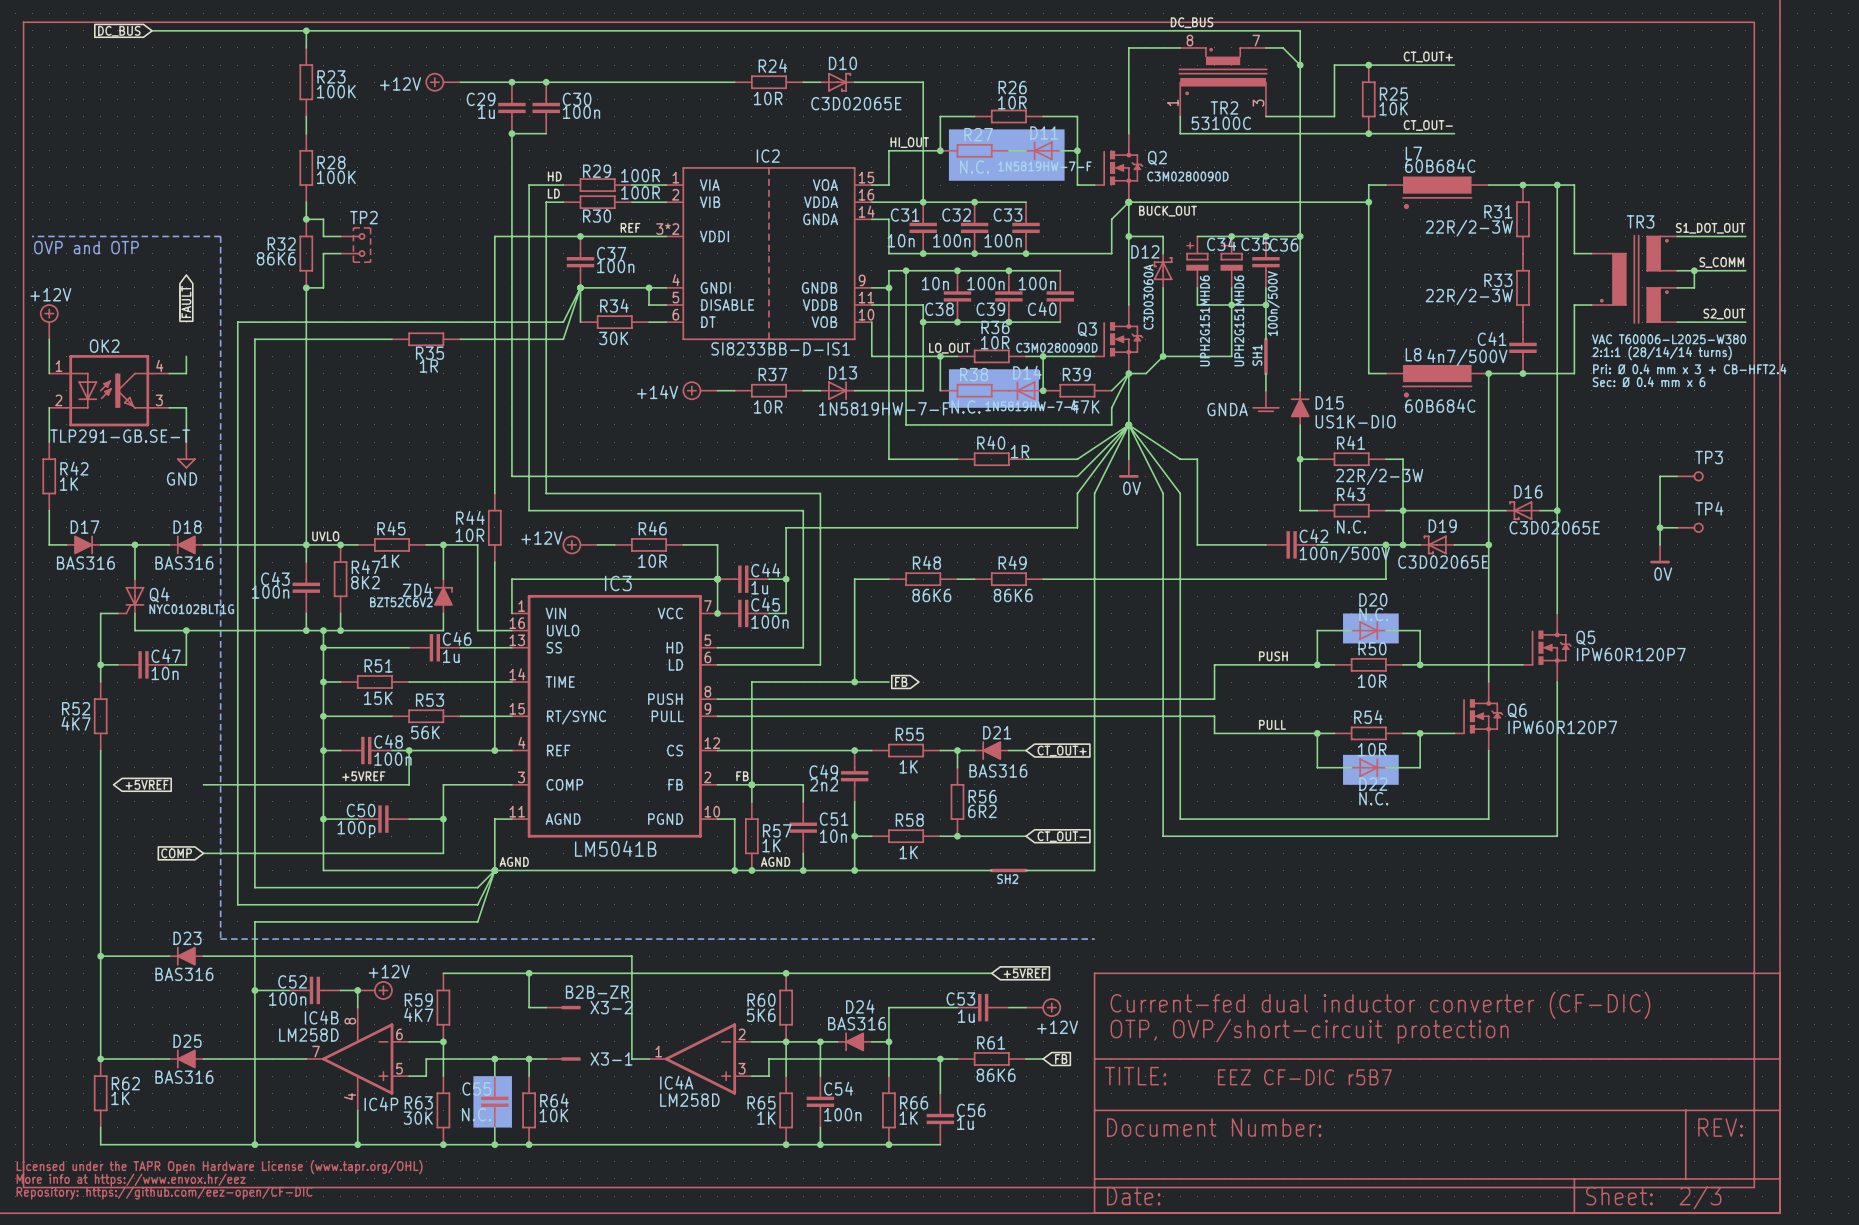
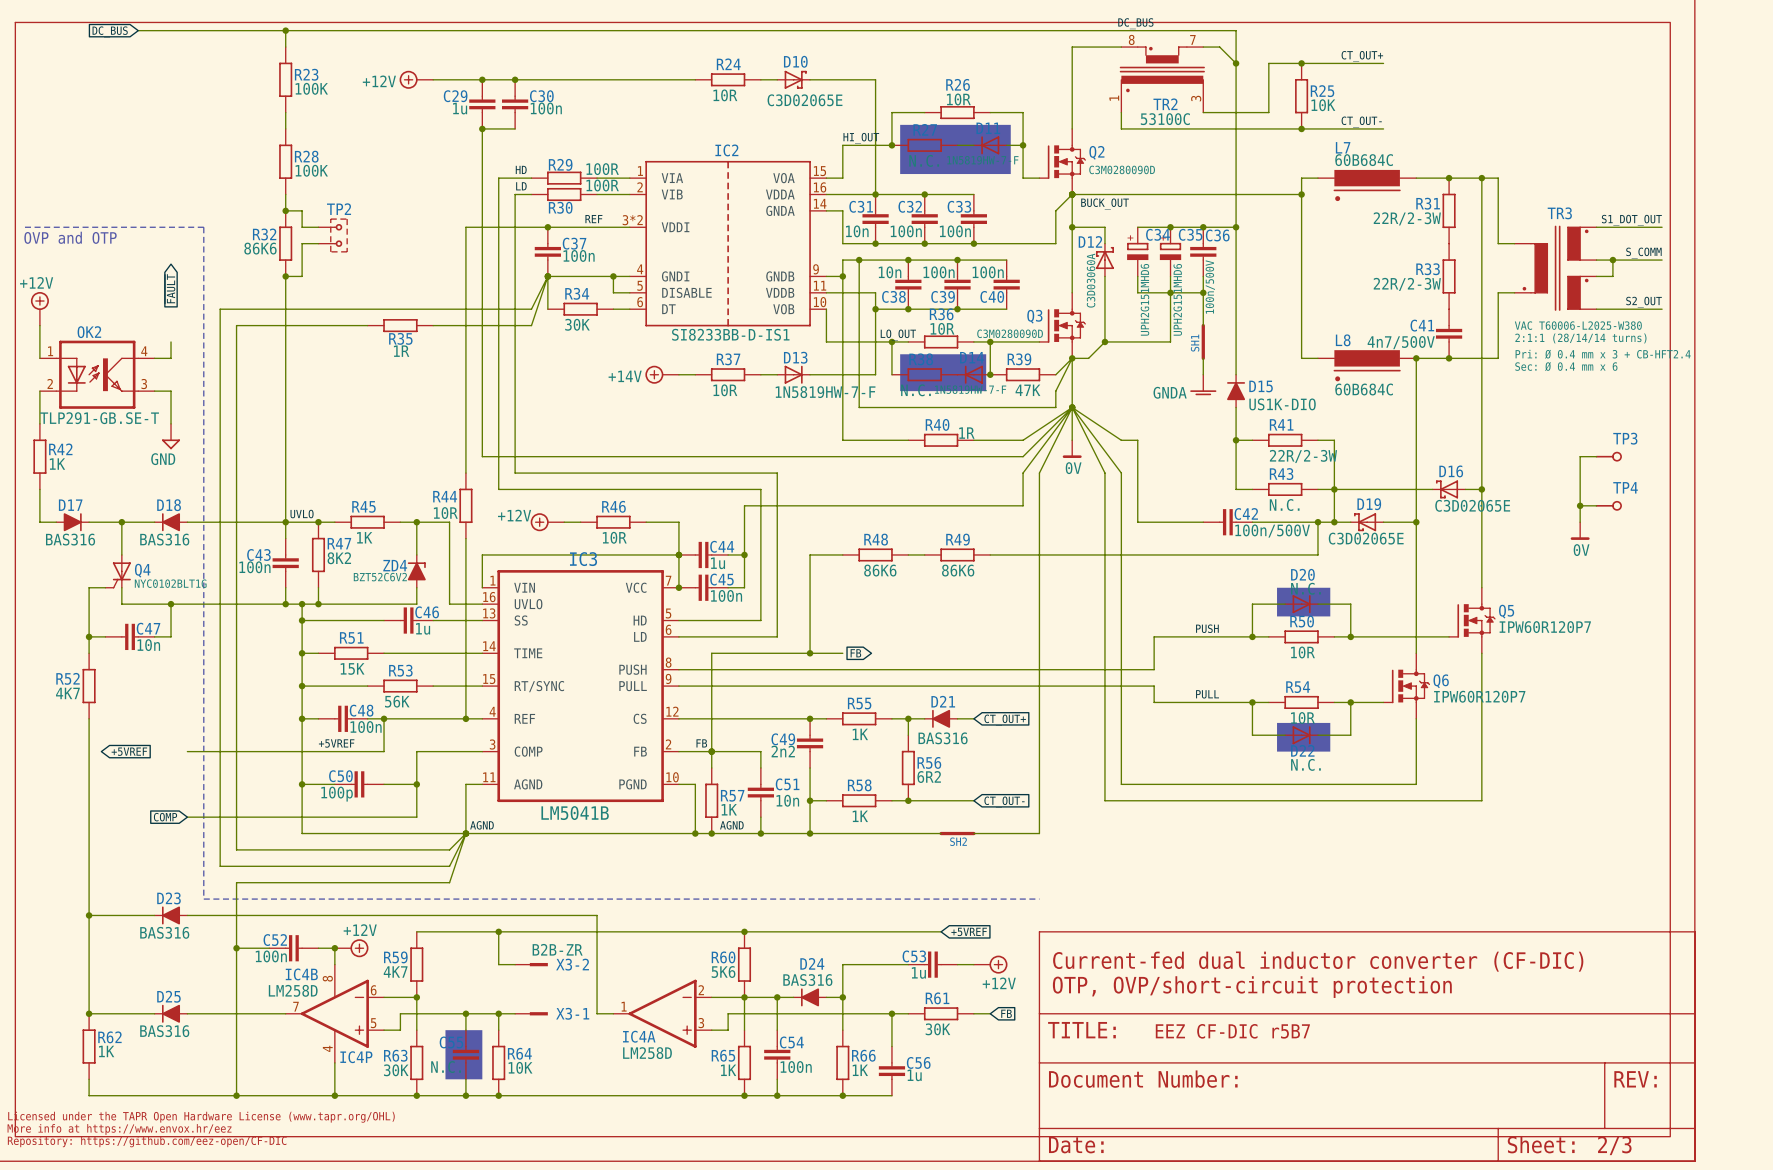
R61 value: 86K6 (996, 1075) -> 30K (937, 1029)

